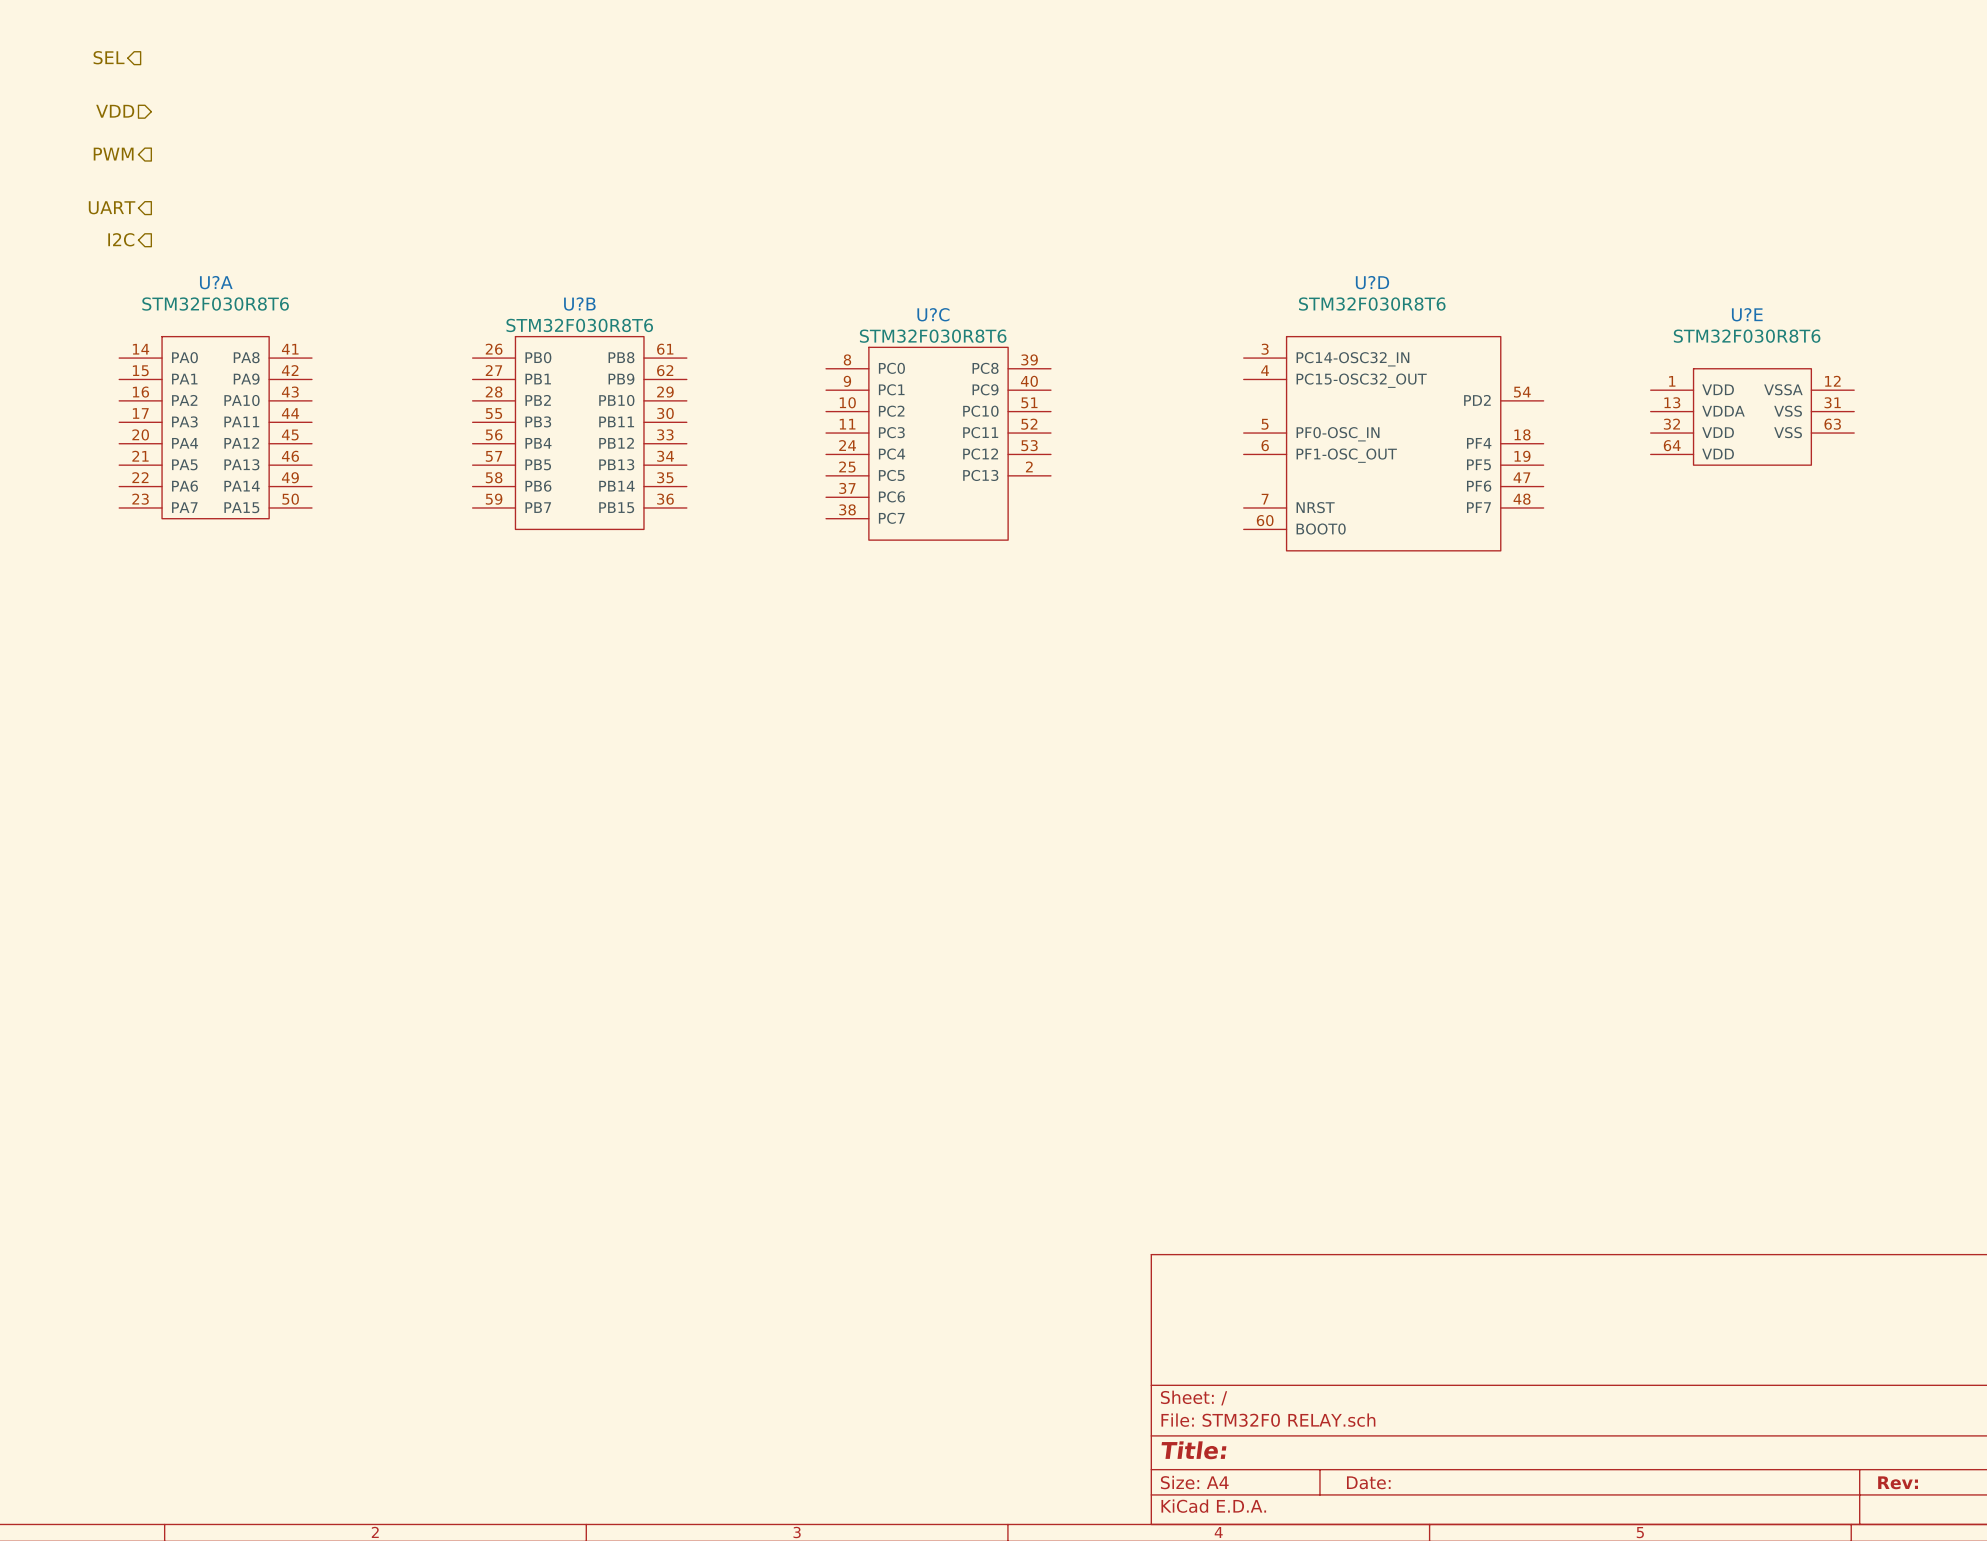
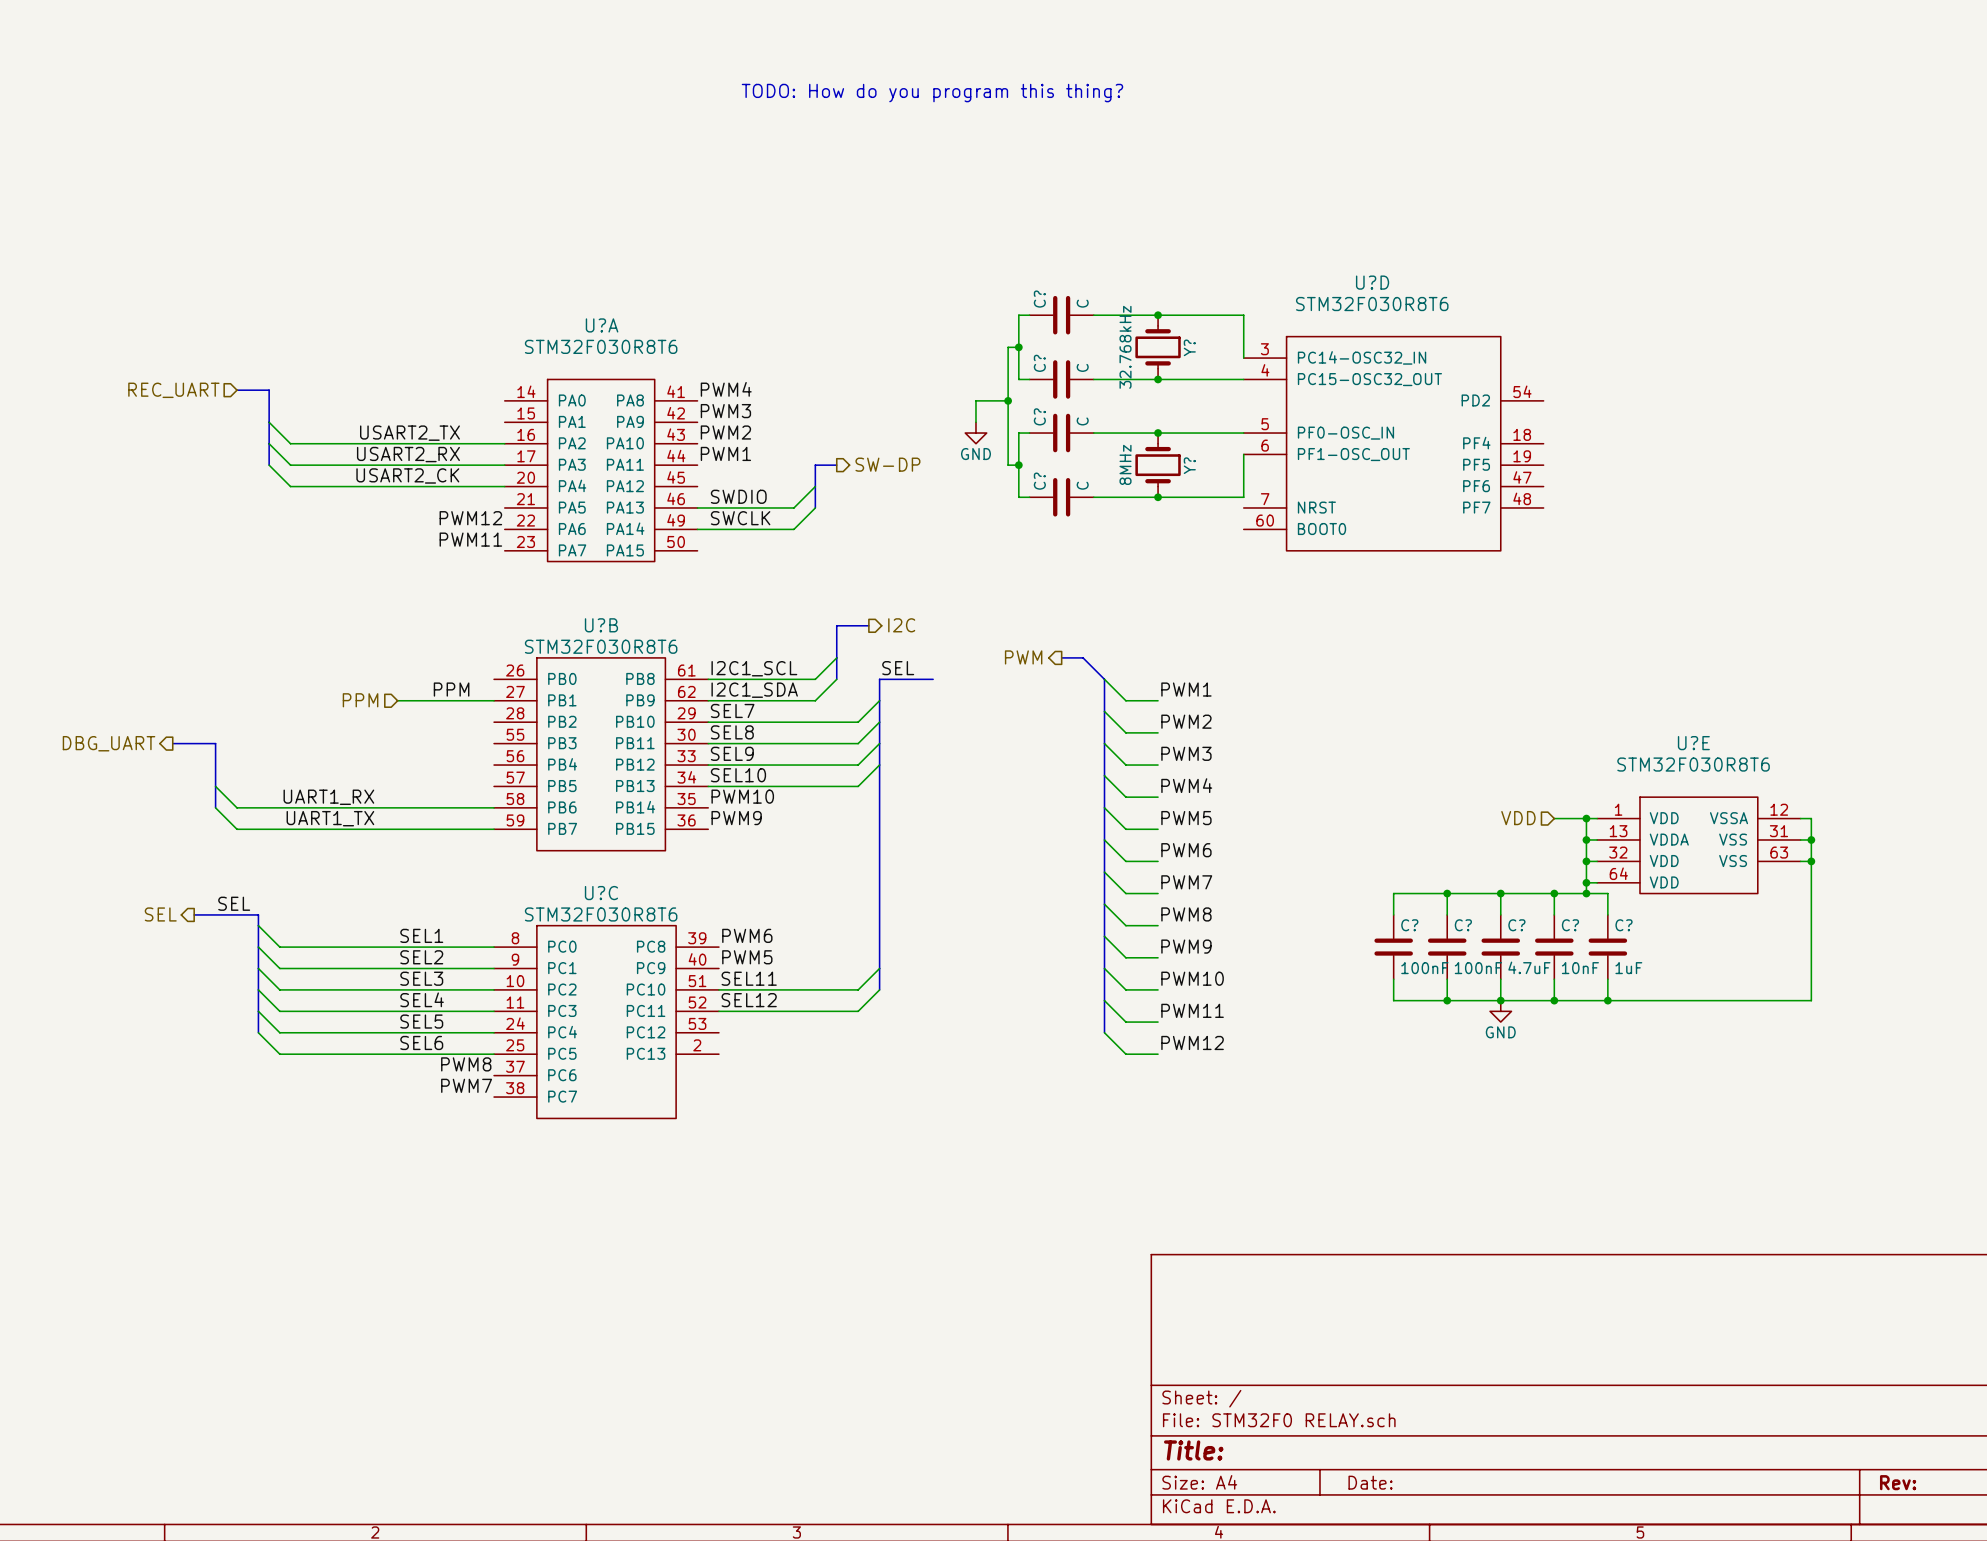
hierarchical label: SEL (109, 57) -> none
text: none -> TODO: How do you program this thing? (932, 93)
hierarchical label: VDD (115, 111) -> none
hierarchical label: PWM (113, 154) -> none
hierarchical label: UART (112, 207) -> none
hierarchical label: I2C (121, 239) -> none
wire: none -> (1029, 315) (1018, 315) (1018, 379) (1029, 379)
C?: none -> C (1061, 315)
wire: none -> (1093, 315) (1243, 315) (1243, 358)
junction: none -> (1158, 315)
junction: none -> (1018, 347)
Y?: none -> 32.768kHz (1158, 347)
C?: none -> C (1061, 379)
wire: none -> (1093, 379) (1243, 379)
junction: none -> (1158, 379)
label: none -> PWM4 (726, 389)
bus: none -> (237, 390) (269, 390) (269, 465)
hierarchical label: none -> REC_UART (173, 390)
wire: none -> (1008, 400) (975, 400) (975, 422)
junction: none -> (1008, 400)
label: none -> PWM3 (725, 411)
U?E: STM32F030R8T6 (1752, 416) -> none
wire: none -> (269, 422) (290, 443) (504, 443)
U?A: STM32F030R8T6 (215, 427) -> none
label: none -> PWM2 (725, 432)
U?B: STM32F030R8T6 (579, 433) -> none
power symbol: none -> GND (975, 433)
wire: none -> (1029, 433) (1018, 433) (1018, 497) (1029, 497)
C?: none -> C (1061, 433)
wire: none -> (1093, 433) (1243, 433)
junction: none -> (1158, 433)
label: none -> USART2_TX (409, 433)
wire: none -> (269, 443) (290, 465) (504, 465)
U?C: STM32F030R8T6 (938, 443) -> none
label: none -> PWM1 (725, 453)
wire: none -> (1243, 454) (1243, 497) (1093, 497)
label: none -> USART2_RX (408, 454)
hierarchical label: none -> SW-DP (887, 464)
wire: none -> (269, 465) (290, 486) (504, 486)
bus: none -> (836, 465) (815, 465) (815, 507)
junction: none -> (1018, 465)
Y?: none -> 8MHz (1158, 465)
U?A: none -> STM32F030R8T6 (601, 470)
label: none -> USART2_CK (407, 475)
wire: none -> (815, 486) (793, 507) (697, 507)
label: none -> SWDIO (738, 496)
C?: none -> C (1061, 497)
junction: none -> (1158, 497)
wire: none -> (815, 507) (793, 529) (697, 529)
label: none -> PWM12 (470, 518)
label: none -> SWCLK (740, 518)
label: none -> PWM11 (470, 539)
bus: none -> (868, 625) (836, 625) (836, 679)
hierarchical label: none -> I2C (901, 625)
wire: none -> (836, 657) (815, 679) (708, 679)
hierarchical label: none -> PWM (1023, 657)
bus: none -> (1061, 657) (1083, 657) (1104, 679) (1104, 1032)
label: none -> SEL (898, 668)
label: none -> I2C1_SCL (754, 668)
wire: none -> (836, 679) (815, 700) (708, 700)
bus: none -> (933, 679) (879, 679) (879, 989)
wire: none -> (1104, 679) (1125, 700) (1158, 700)
label: none -> PPM (451, 689)
label: none -> PWM1 (1186, 689)
label: none -> I2C1_SDA (754, 690)
hierarchical label: none -> PPM (360, 700)
wire: none -> (397, 700) (494, 700)
wire: none -> (879, 700) (858, 722) (708, 722)
label: none -> SEL7 (732, 710)
wire: none -> (1104, 711) (1125, 732) (1158, 732)
label: none -> PWM2 (1186, 721)
wire: none -> (879, 722) (858, 743) (708, 743)
label: none -> SEL8 (732, 732)
bus: none -> (172, 743) (215, 743) (215, 807)
wire: none -> (879, 743) (858, 765) (708, 765)
wire: none -> (1104, 743) (1125, 765) (1158, 765)
hierarchical label: none -> DBG_UART (109, 743)
label: none -> SEL9 (732, 753)
label: none -> PWM3 (1186, 753)
U?B: none -> STM32F030R8T6 (601, 754)
wire: none -> (879, 765) (858, 786) (708, 786)
label: none -> SEL10 (738, 775)
wire: none -> (1104, 775) (1125, 797) (1158, 797)
label: none -> PWM4 (1186, 785)
wire: none -> (215, 786) (237, 807) (494, 807)
label: none -> PWM10 (742, 796)
label: none -> UART1_RX (328, 797)
wire: none -> (215, 807) (237, 829) (494, 829)
wire: none -> (1104, 807) (1125, 829) (1158, 829)
label: none -> PWM9 (736, 818)
label: none -> PWM5 (1186, 818)
hierarchical label: none -> VDD (1518, 818)
wire: none -> (1554, 818) (1597, 818)
wire: none -> (1586, 818) (1586, 893)
junction: none -> (1586, 818)
wire: none -> (1800, 818) (1811, 818) (1811, 1000) (1393, 1000) (1393, 979)
label: none -> UART1_TX (330, 818)
wire: none -> (1104, 839) (1125, 861) (1158, 861)
wire: none -> (1586, 839) (1597, 839)
junction: none -> (1586, 839)
wire: none -> (1800, 839) (1811, 839)
junction: none -> (1811, 839)
U?E: none -> STM32F030R8T6 (1698, 845)
label: none -> PWM6 (1186, 850)
wire: none -> (1586, 861) (1597, 861)
junction: none -> (1586, 861)
wire: none -> (1800, 861) (1811, 861)
junction: none -> (1811, 861)
wire: none -> (1104, 872) (1125, 893) (1158, 893)
label: none -> PWM7 (1186, 882)
wire: none -> (1586, 882) (1597, 882)
junction: none -> (1586, 882)
wire: none -> (1447, 893) (1447, 914)
junction: none -> (1447, 893)
wire: none -> (1500, 893) (1500, 914)
junction: none -> (1500, 893)
wire: none -> (1554, 893) (1554, 914)
junction: none -> (1554, 893)
junction: none -> (1586, 893)
label: none -> SEL (234, 903)
wire: none -> (1104, 904) (1125, 925) (1158, 925)
hierarchical label: none -> SEL (160, 914)
bus: none -> (194, 914) (258, 914) (258, 1032)
label: none -> PWM8 (1186, 914)
wire: none -> (1393, 914) (1393, 893) (1607, 893) (1607, 914)
wire: none -> (258, 925) (279, 947) (494, 947)
label: none -> SEL1 (421, 935)
label: none -> PWM6 (747, 935)
wire: none -> (1104, 936) (1125, 957) (1158, 957)
label: none -> PWM9 (1186, 946)
wire: none -> (258, 947) (279, 968) (494, 968)
C?: none -> 100nF (1393, 947)
C?: none -> 100nF (1447, 947)
C?: none -> 4.7uF (1500, 947)
C?: none -> 10nF (1554, 947)
C?: none -> 1uF (1607, 947)
label: none -> SEL2 (421, 957)
label: none -> PWM5 (747, 957)
wire: none -> (258, 968) (279, 989) (494, 989)
wire: none -> (879, 968) (858, 989) (718, 989)
wire: none -> (1104, 968) (1125, 989) (1158, 989)
label: none -> SEL3 (421, 978)
label: none -> SEL11 (749, 978)
label: none -> PWM10 (1192, 978)
wire: none -> (1447, 979) (1447, 1000)
wire: none -> (1500, 979) (1500, 1000)
wire: none -> (1554, 979) (1554, 1000)
wire: none -> (1607, 979) (1607, 1000)
wire: none -> (258, 989) (279, 1011) (494, 1011)
wire: none -> (879, 989) (858, 1011) (718, 1011)
label: none -> SEL4 (422, 999)
label: none -> SEL12 (749, 1000)
wire: none -> (1104, 1000) (1125, 1022) (1158, 1022)
junction: none -> (1447, 1000)
junction: none -> (1500, 1000)
junction: none -> (1554, 1000)
junction: none -> (1607, 1000)
label: none -> PWM11 (1192, 1010)
wire: none -> (258, 1011) (279, 1032) (494, 1032)
power symbol: none -> GND (1500, 1011)
label: none -> SEL5 (421, 1021)
U?C: none -> STM32F030R8T6 (606, 1022)
wire: none -> (258, 1032) (279, 1054) (494, 1054)
wire: none -> (1104, 1032) (1125, 1054) (1158, 1054)
label: none -> SEL6 (421, 1042)
label: none -> PWM12 (1192, 1042)
label: none -> PWM8 (466, 1064)
label: none -> PWM7 (466, 1085)

